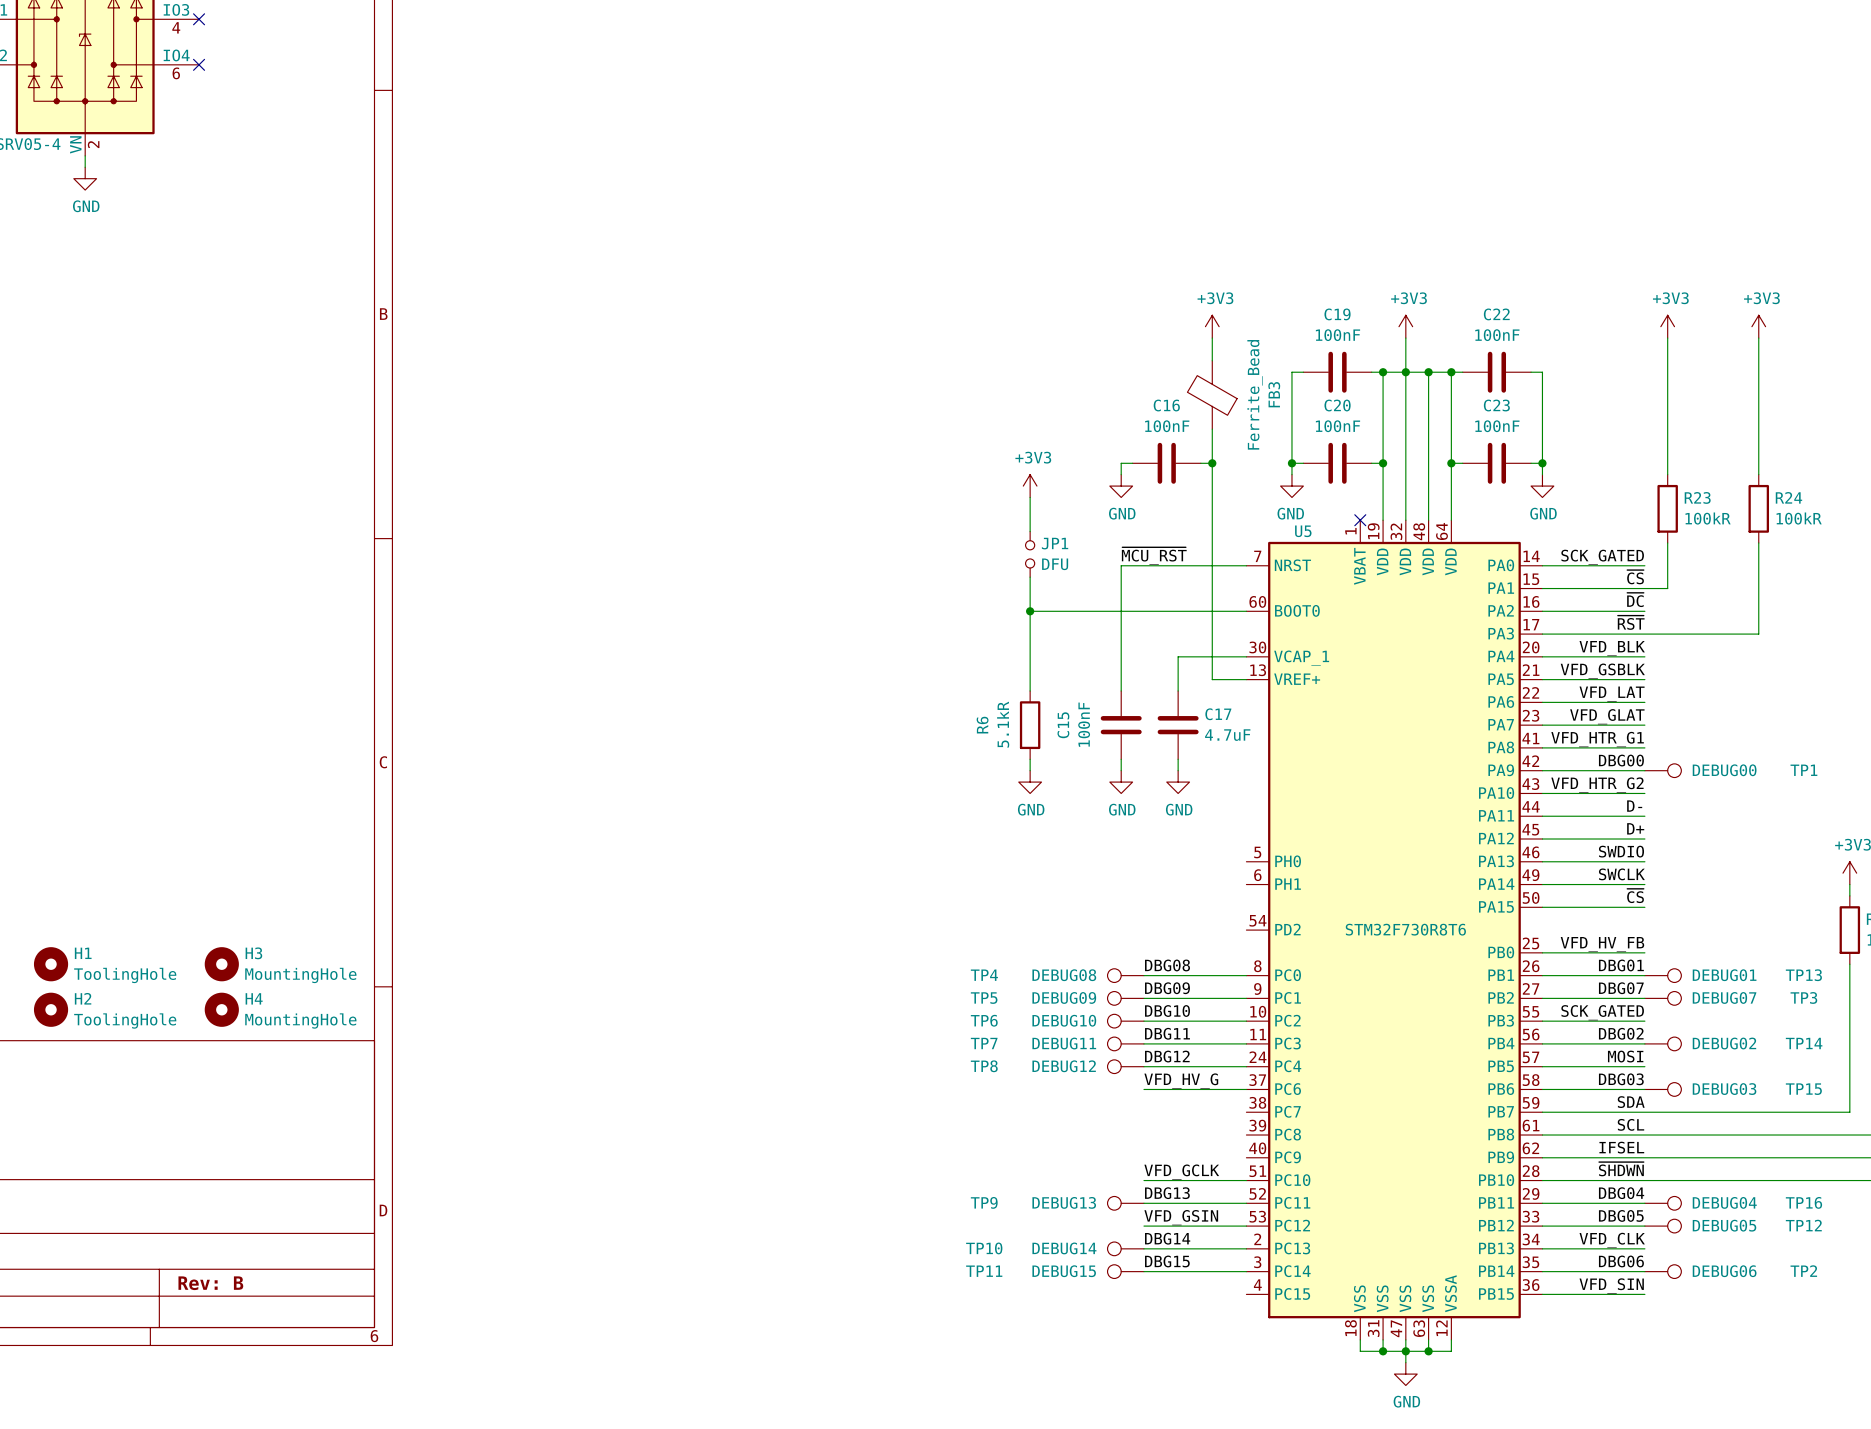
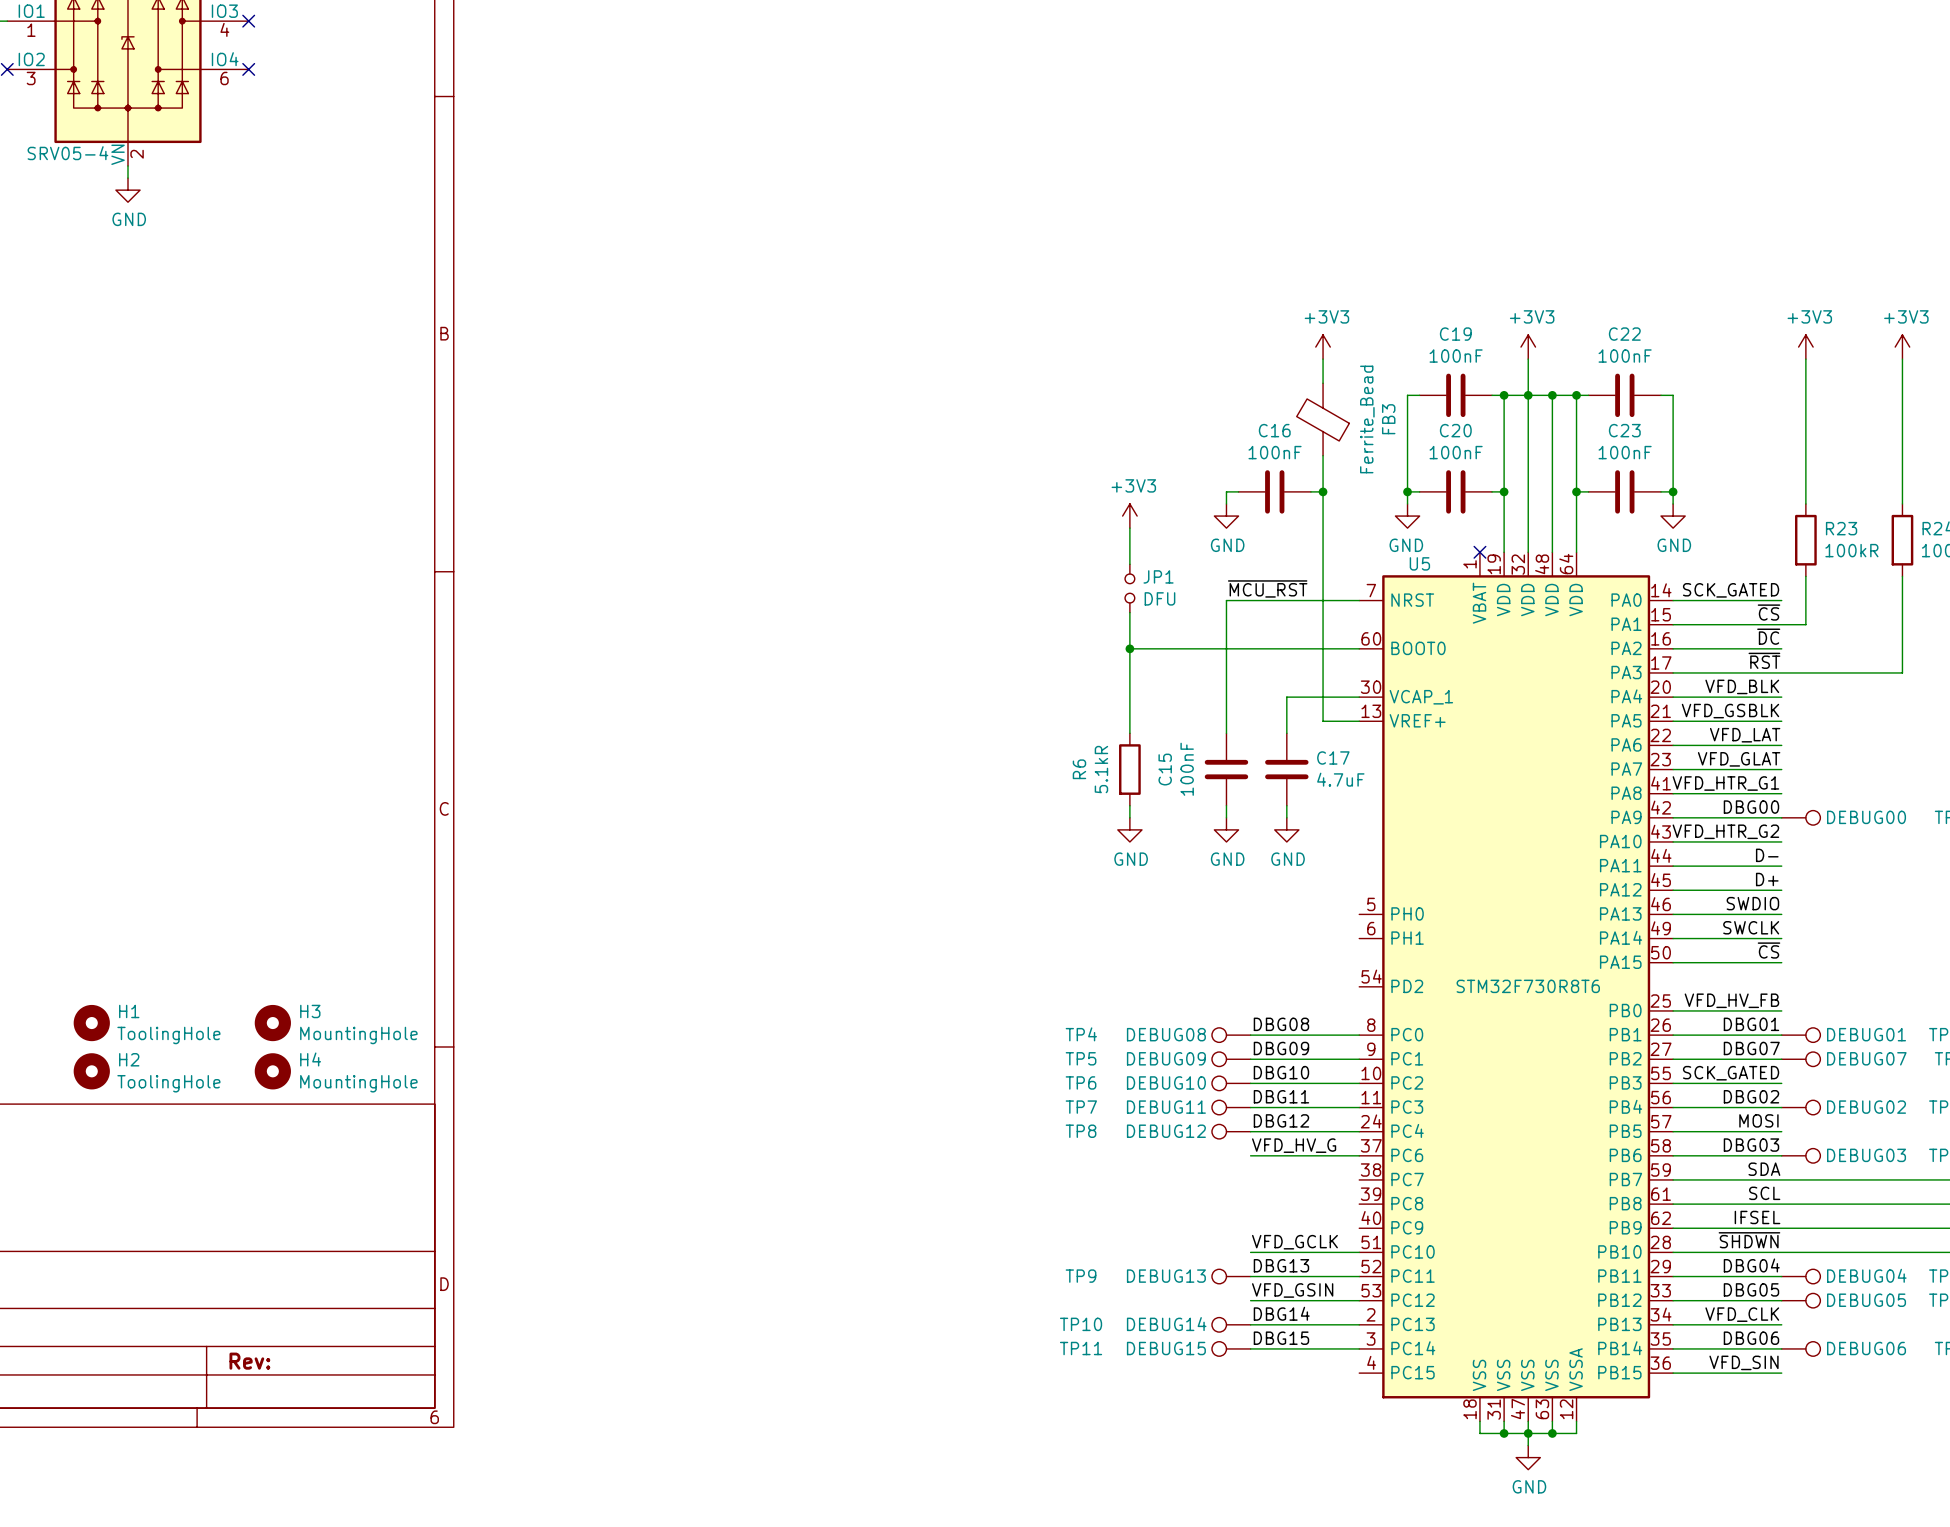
title block: Rev: B (210, 1283) -> Rev: (249, 1361)

